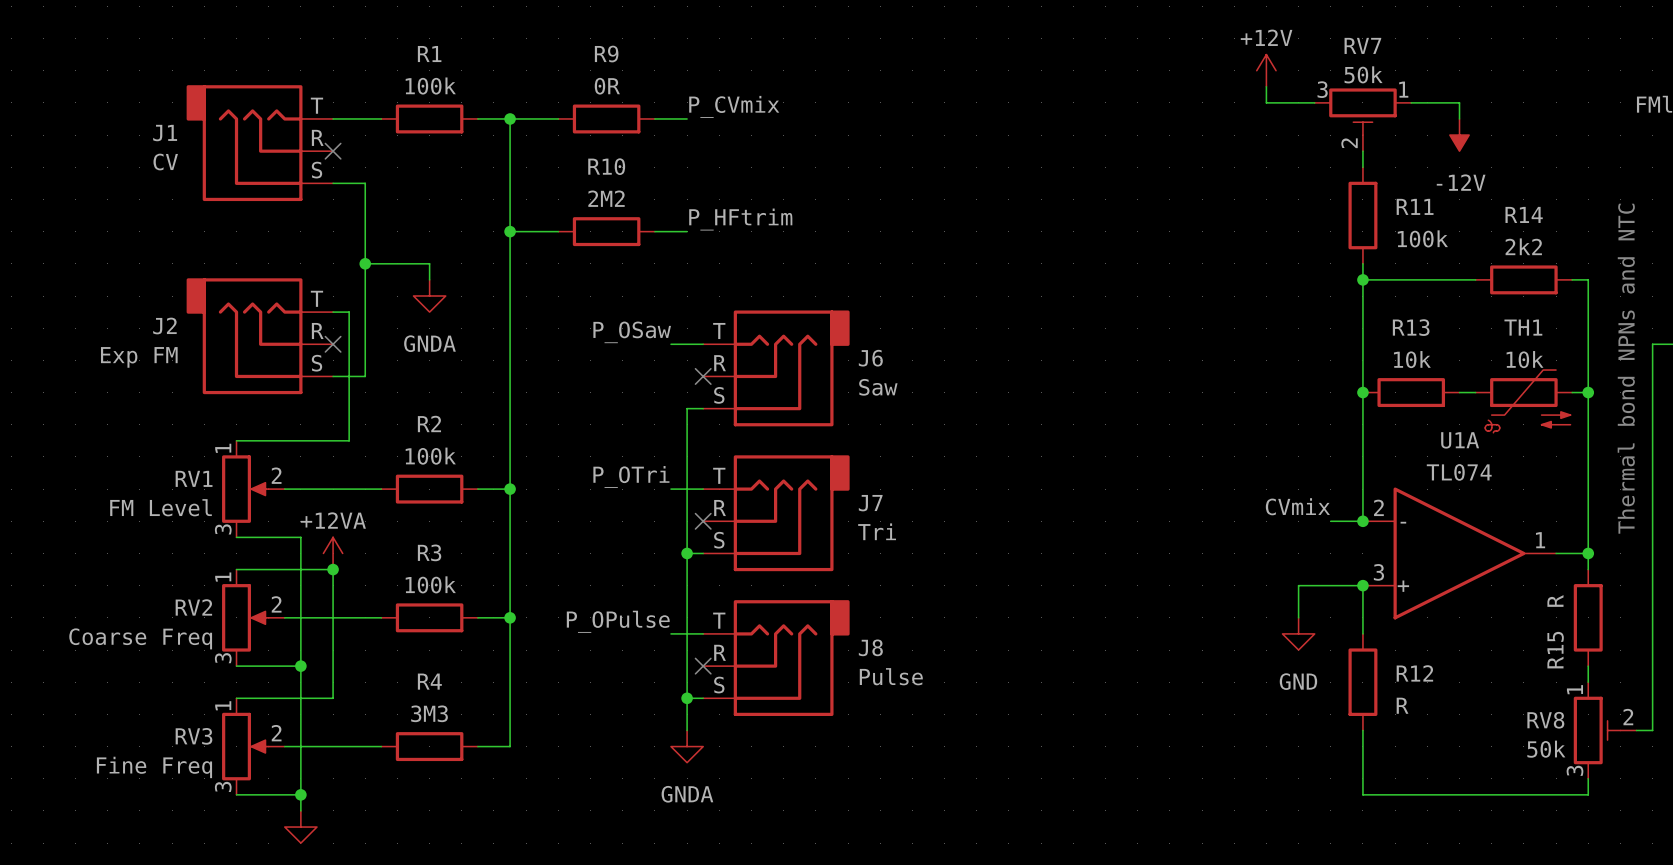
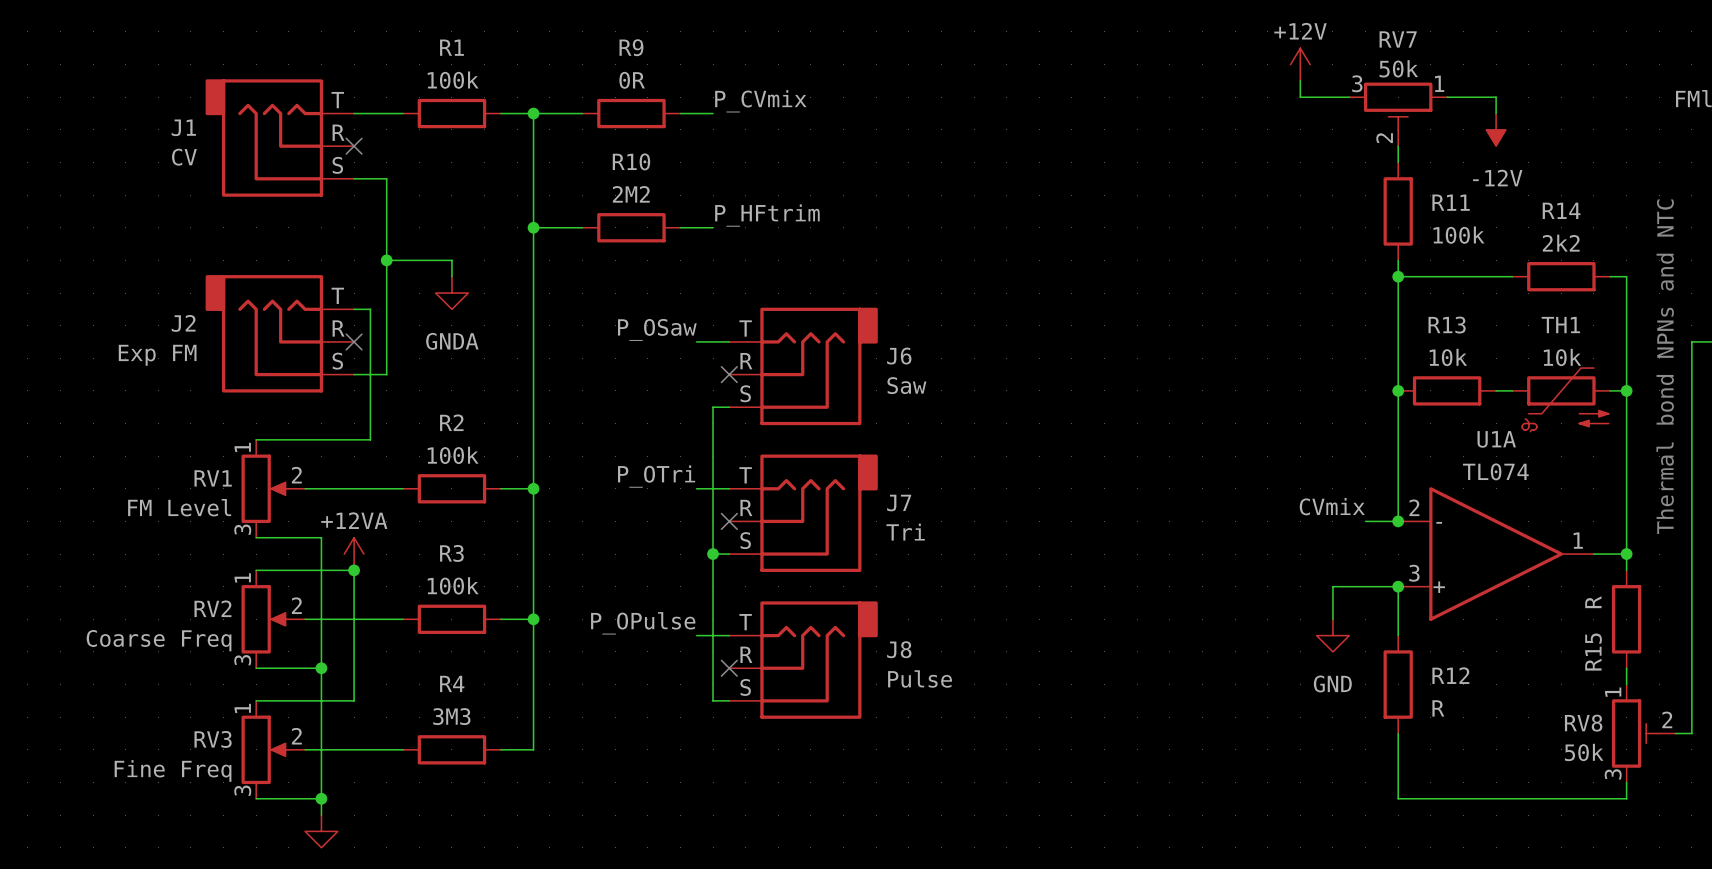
wire: (687, 698) (687, 730) -> none
junction: (687, 698) -> none
power symbol: GNDA (687, 746) -> none

